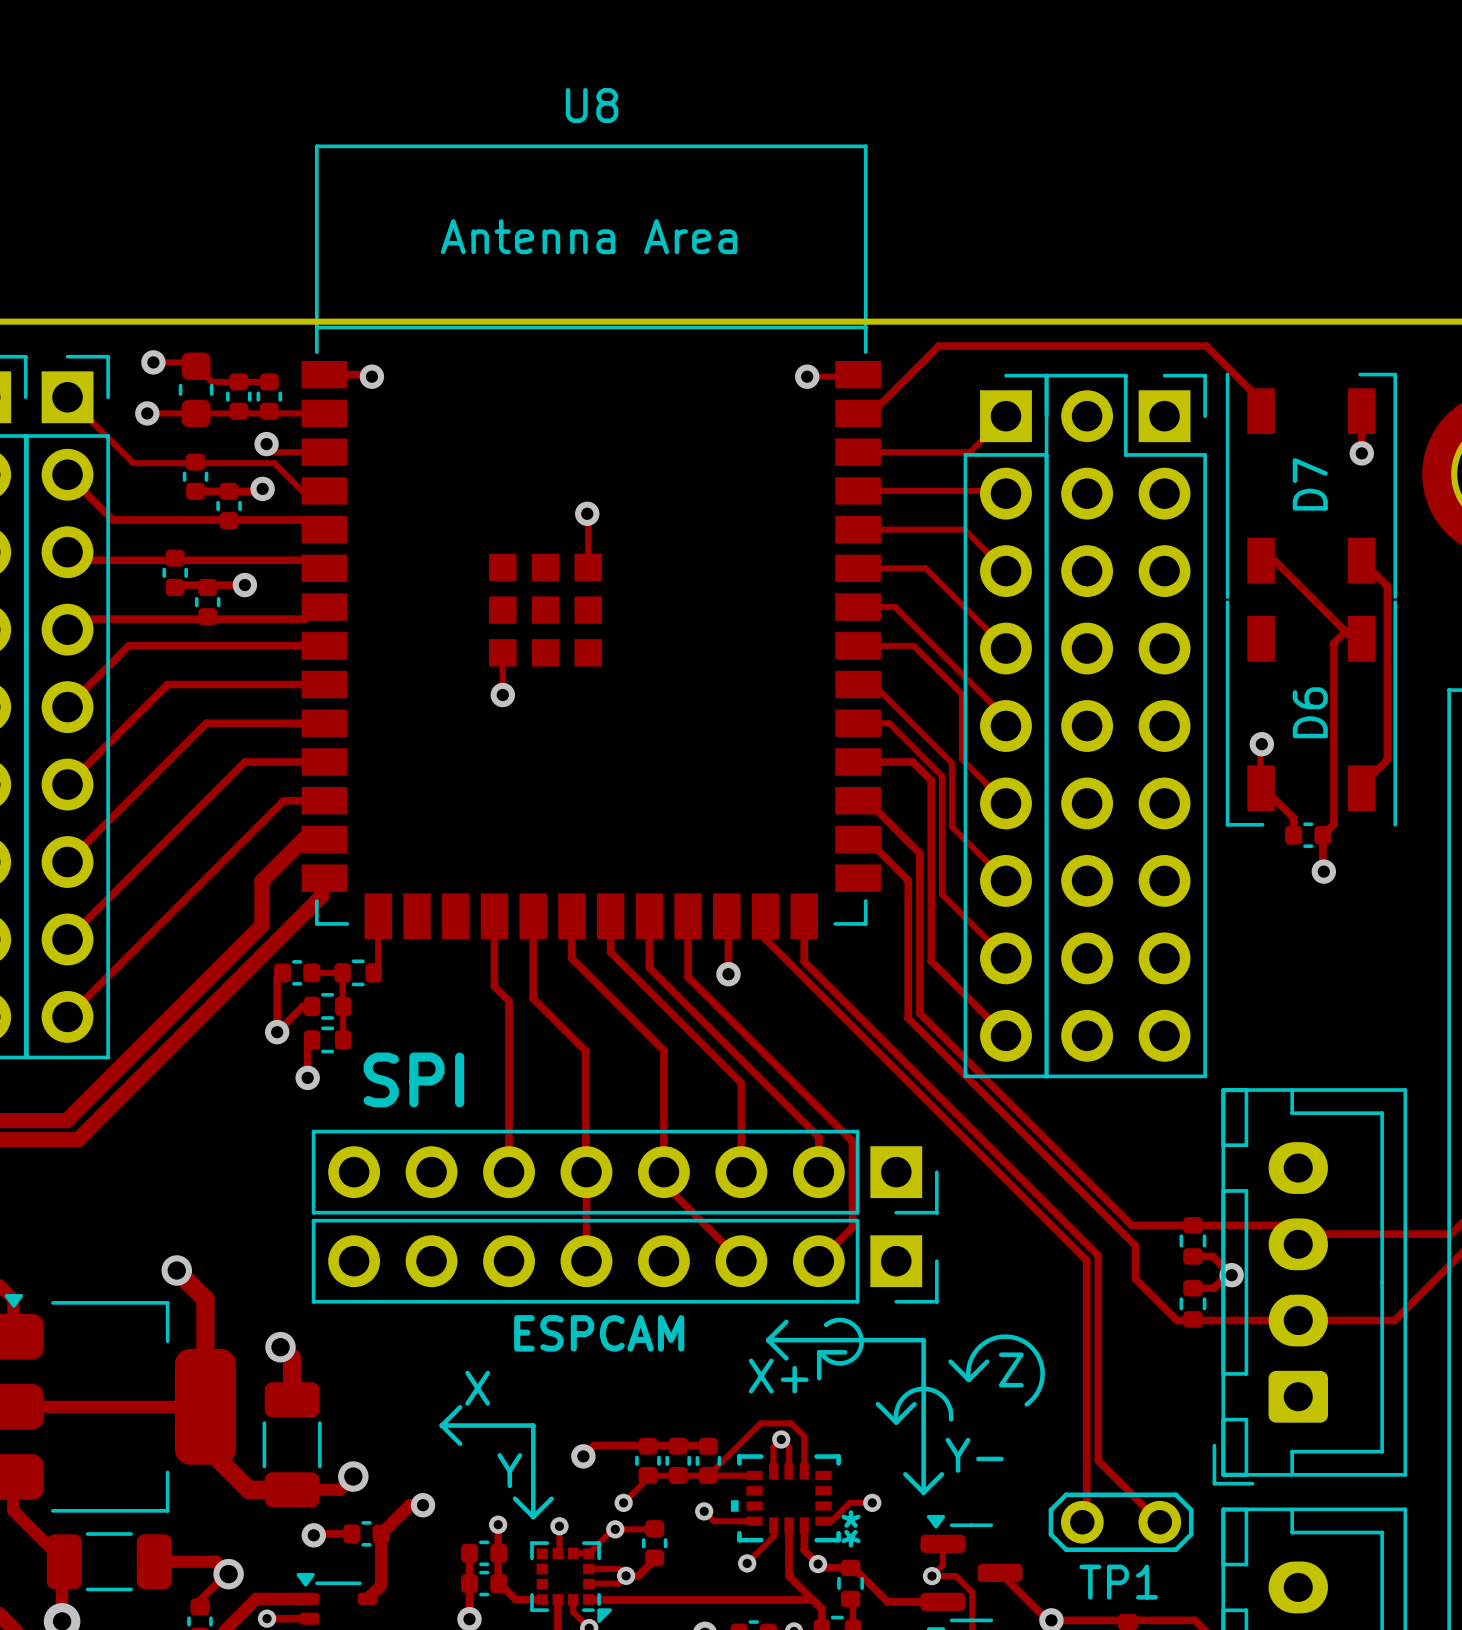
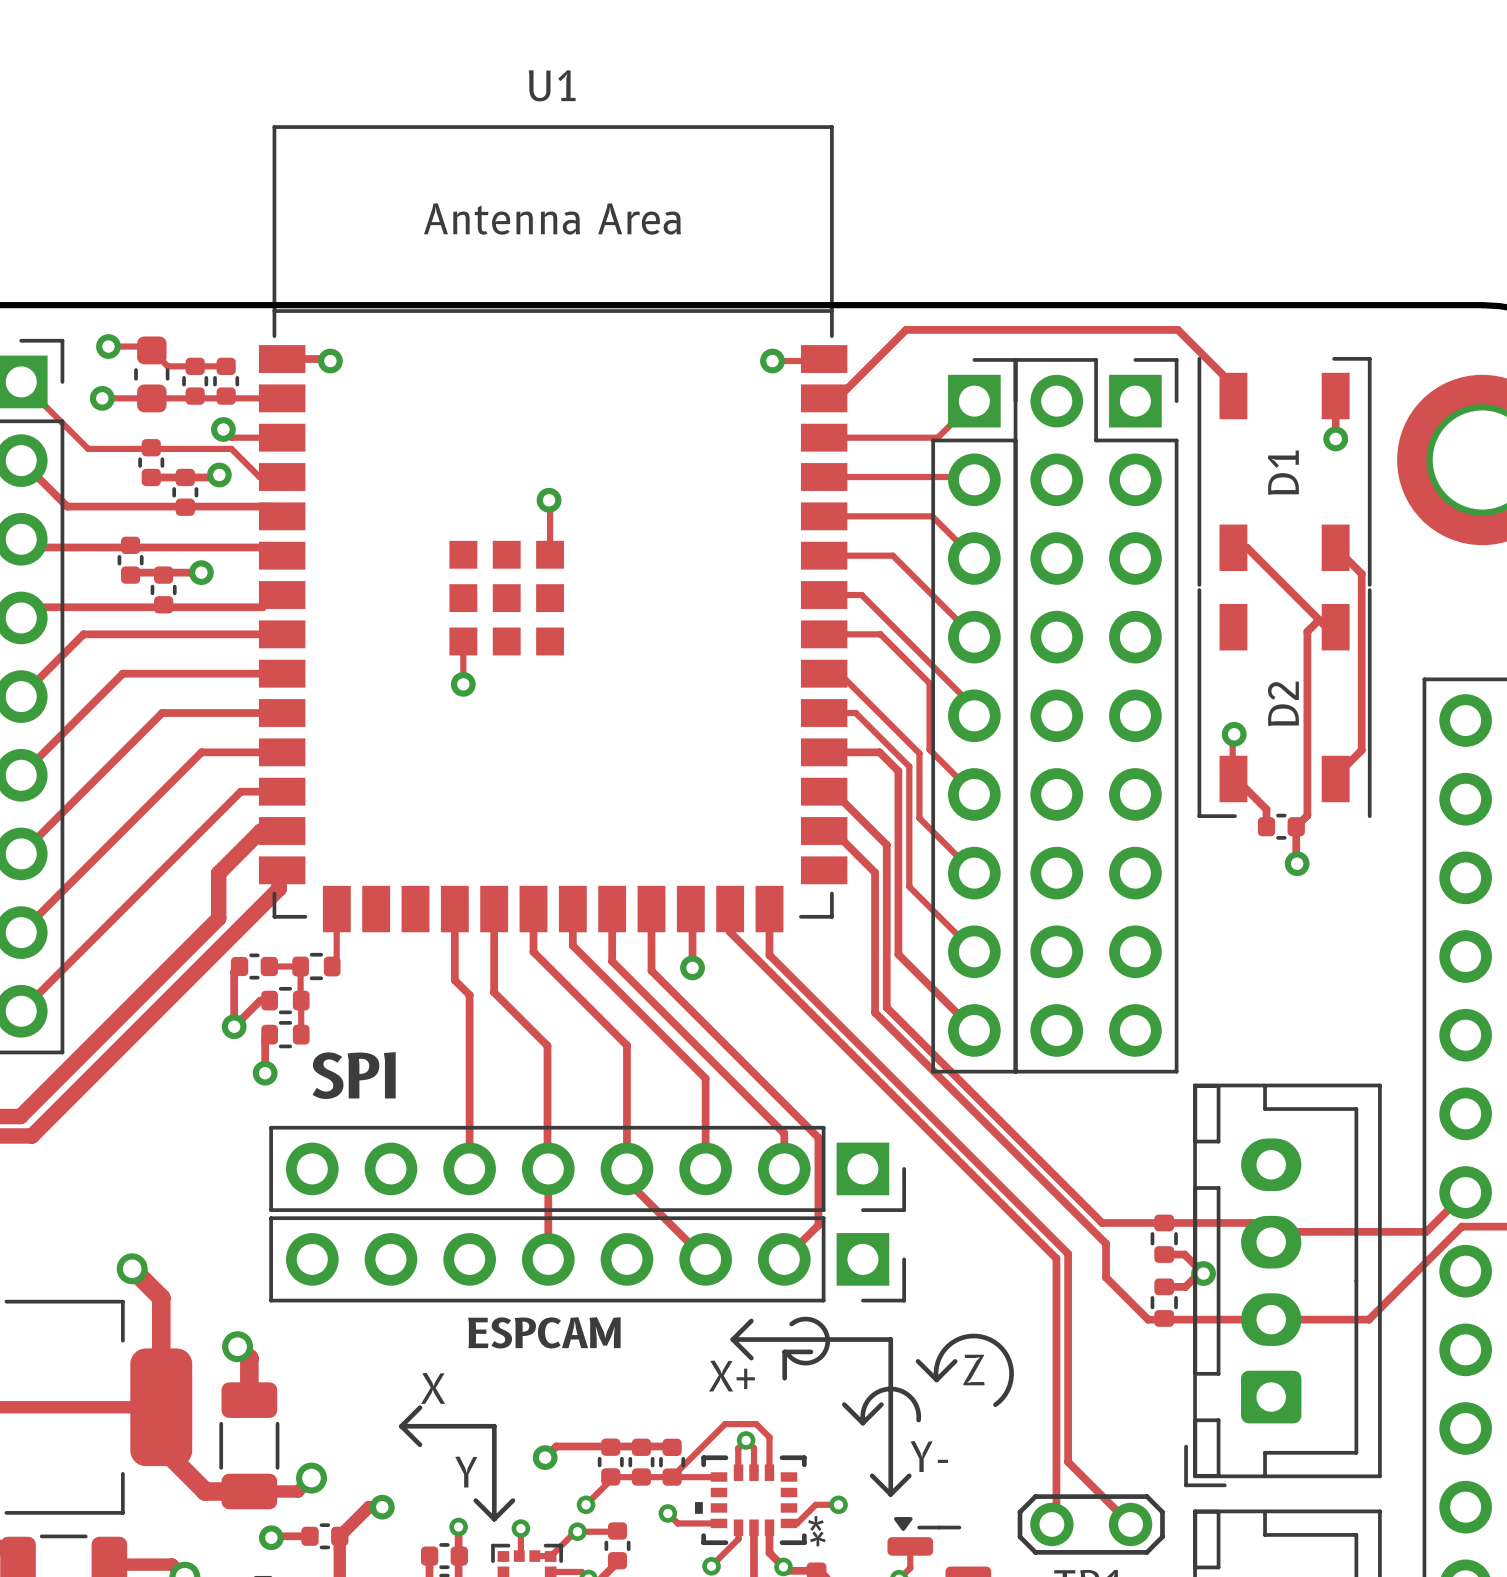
U8 name: U8 (592, 105) -> U1 (552, 85)
D7 name: D7 (1310, 484) -> D1 (1283, 472)
D6 name: D6 (1310, 712) -> D2 (1283, 703)

